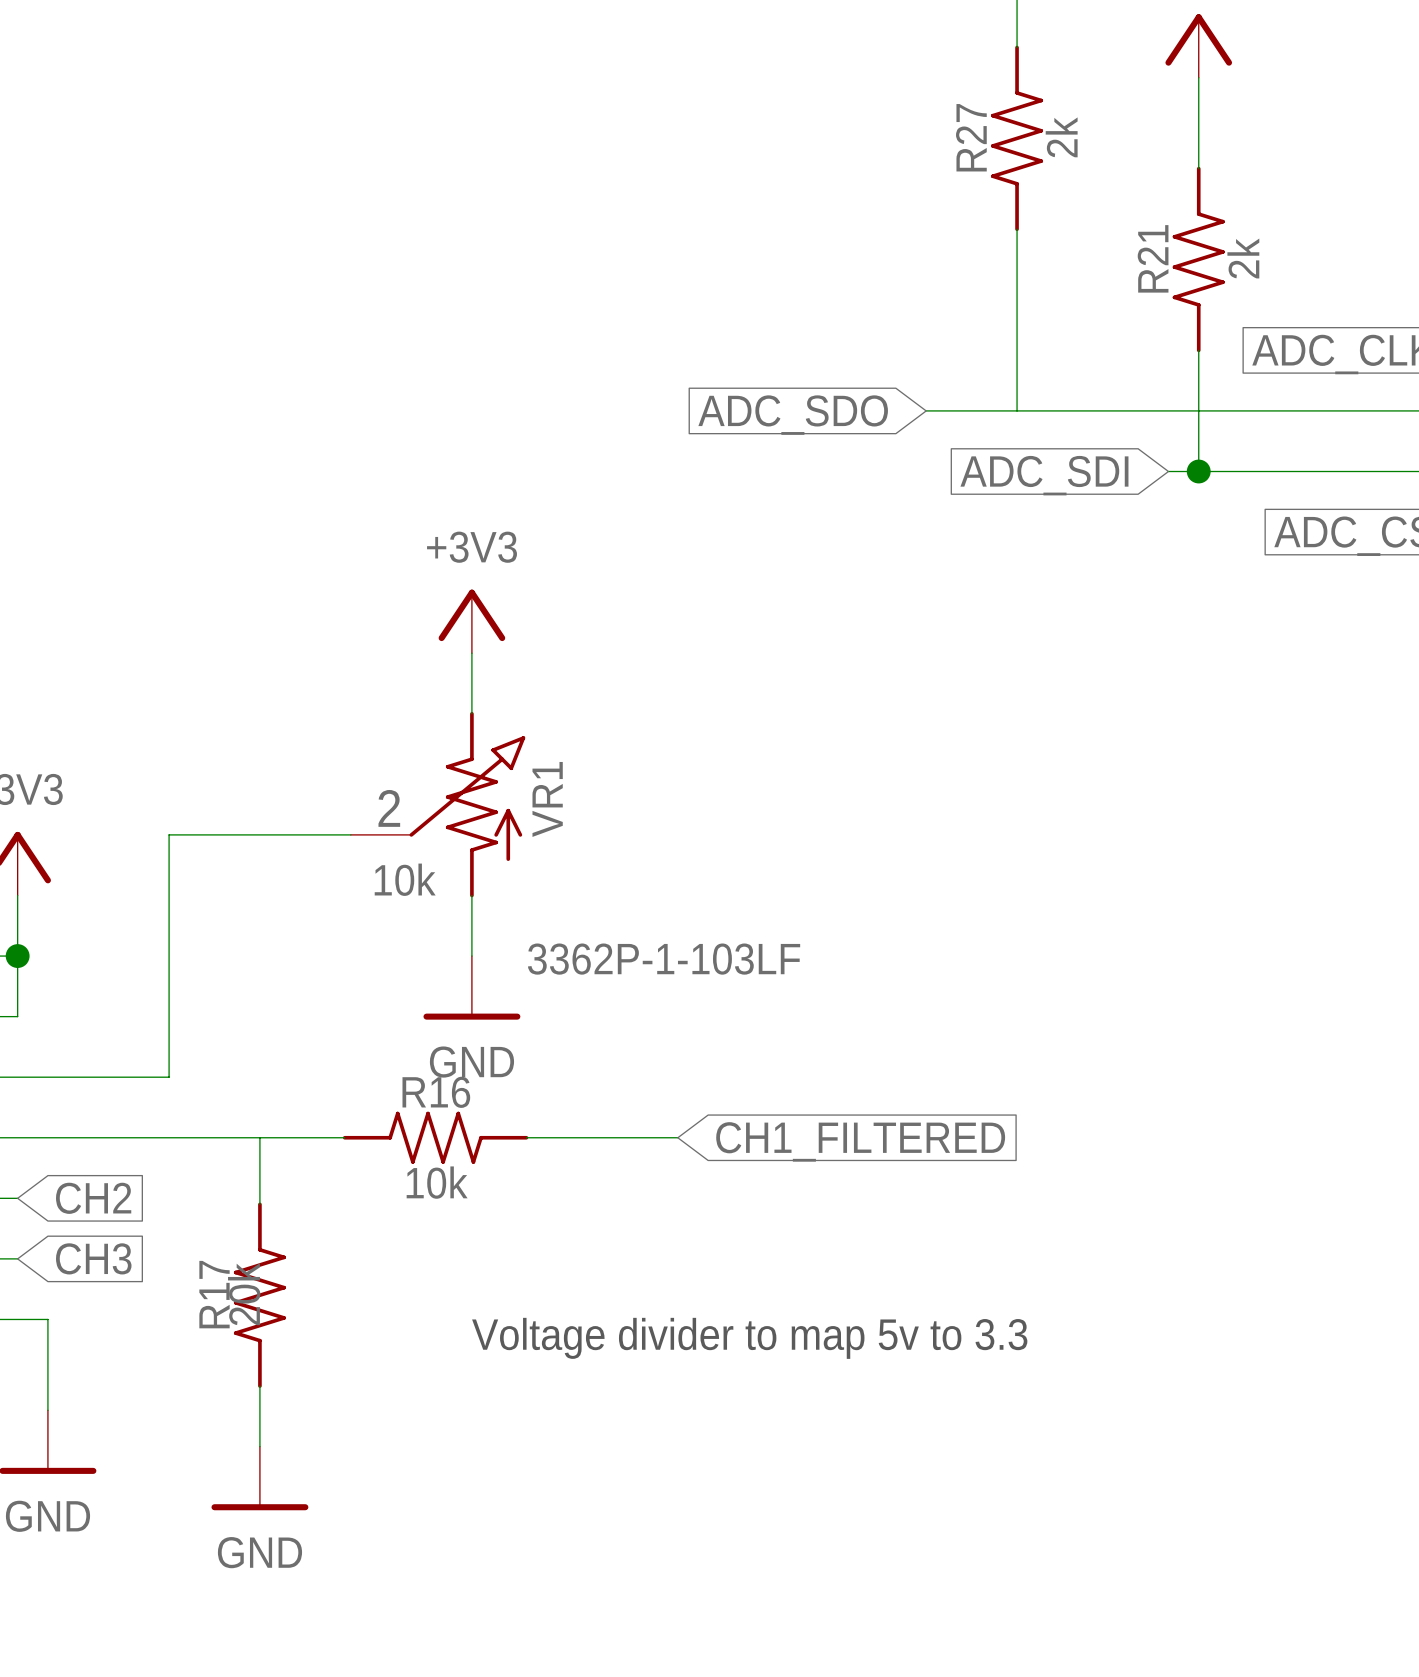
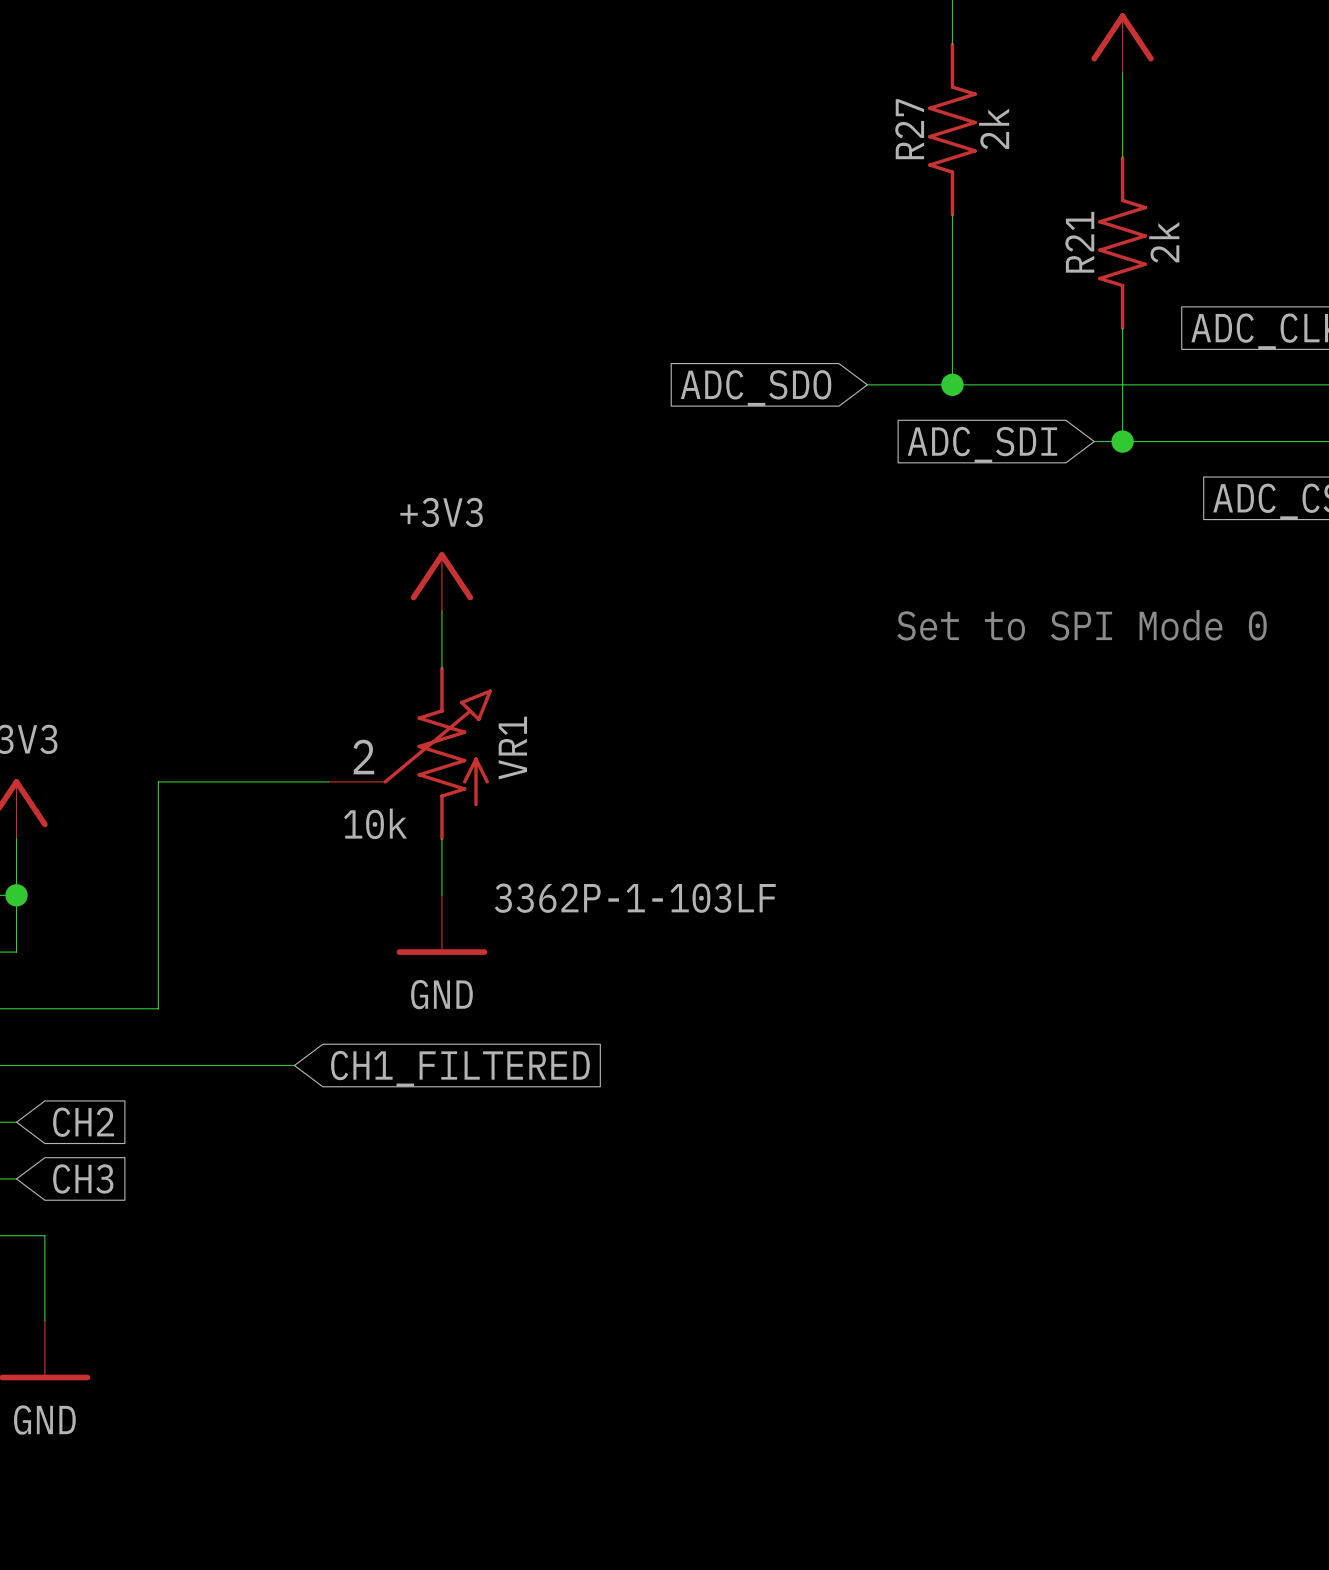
junction: none -> (952, 384)
text: none -> Set to SPI Mode 0 (1082, 625)
wire: (259, 1137) (259, 1204) -> none
wire: (314, 1137) (344, 1137) -> none
R16: (435, 1137) -> none
wire: (526, 1137) (677, 1137) -> none
global label position: CH1_FILTERED (860, 1141) -> CH1_FILTERED (460, 1068)
R17: (259, 1295) -> none
text: Voltage divider to map 5v to 3.3 (749, 1338) -> none
wire: (259, 1386) (259, 1446) -> none
power symbol: GND (259, 1478) -> none

